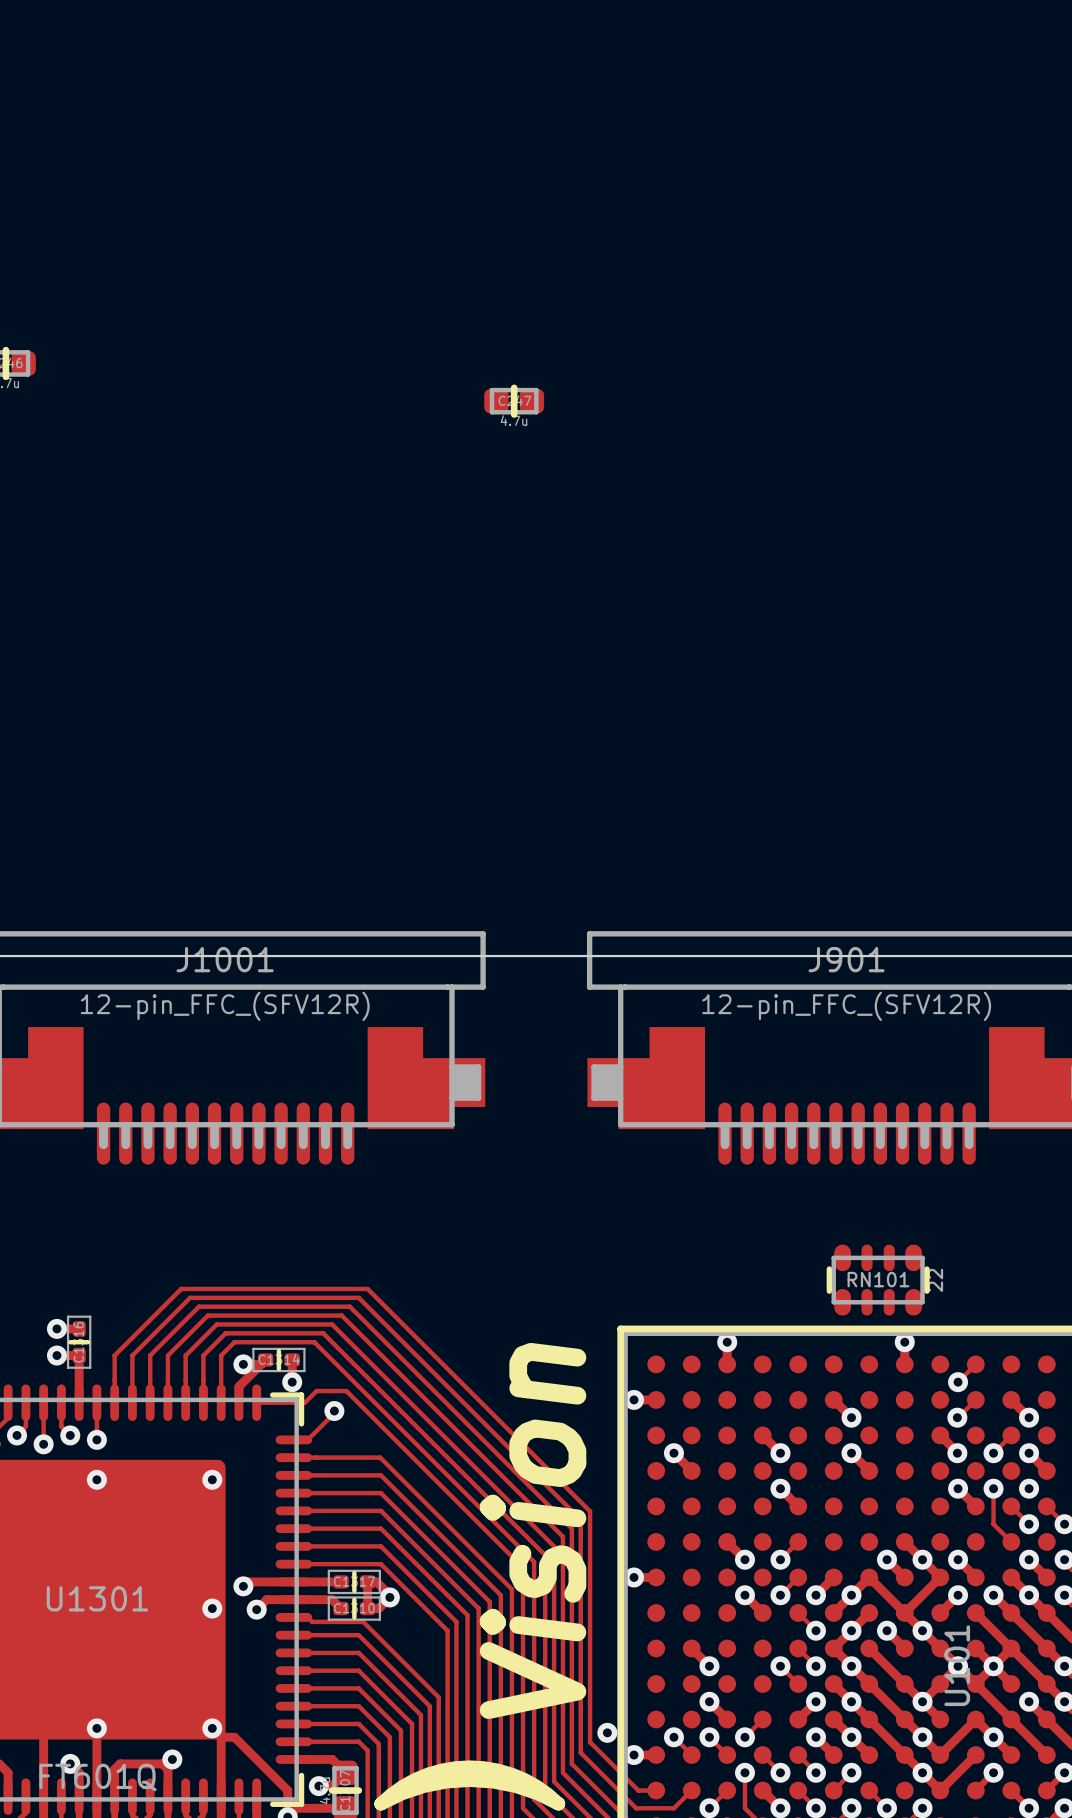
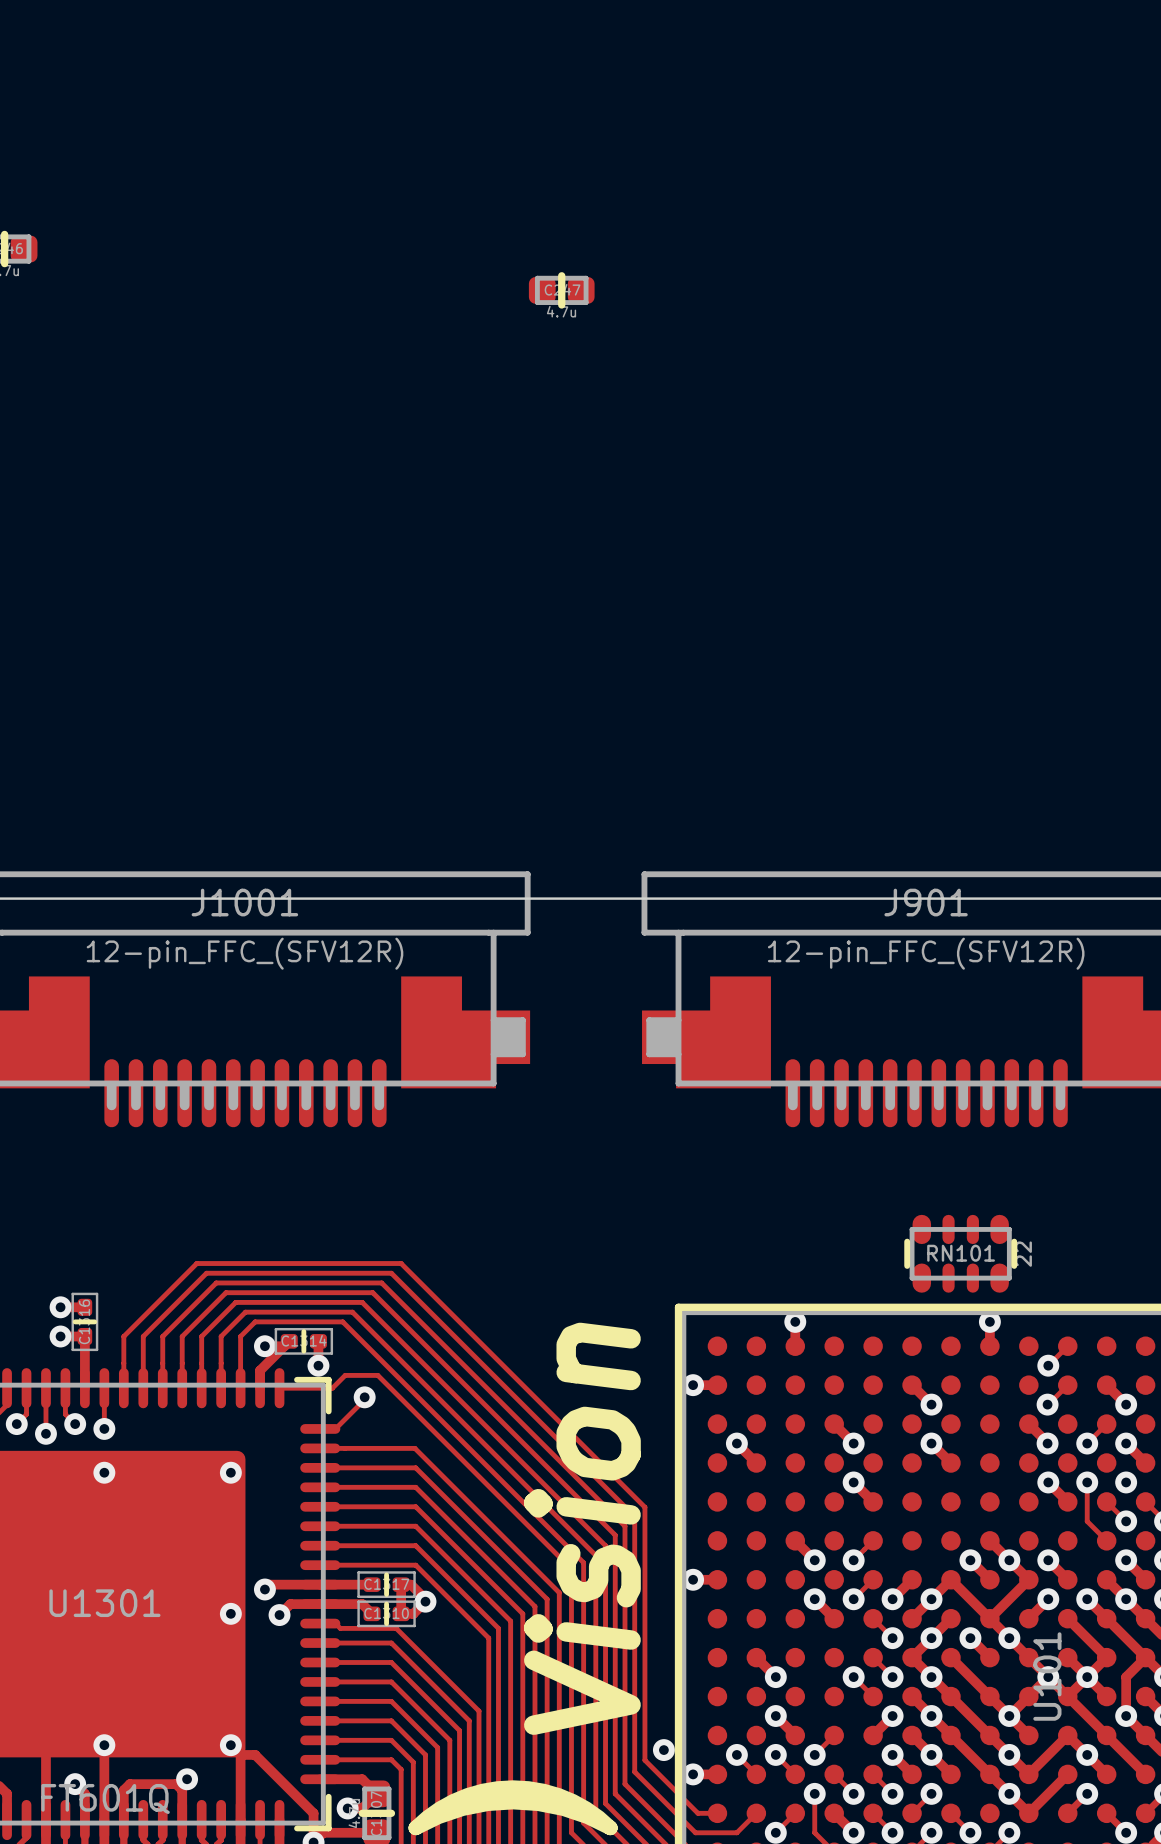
track: (1011, 1648) (1046, 1684) -> none
track: none -> (1145, 1657) (1126, 1677) (1126, 1716)

